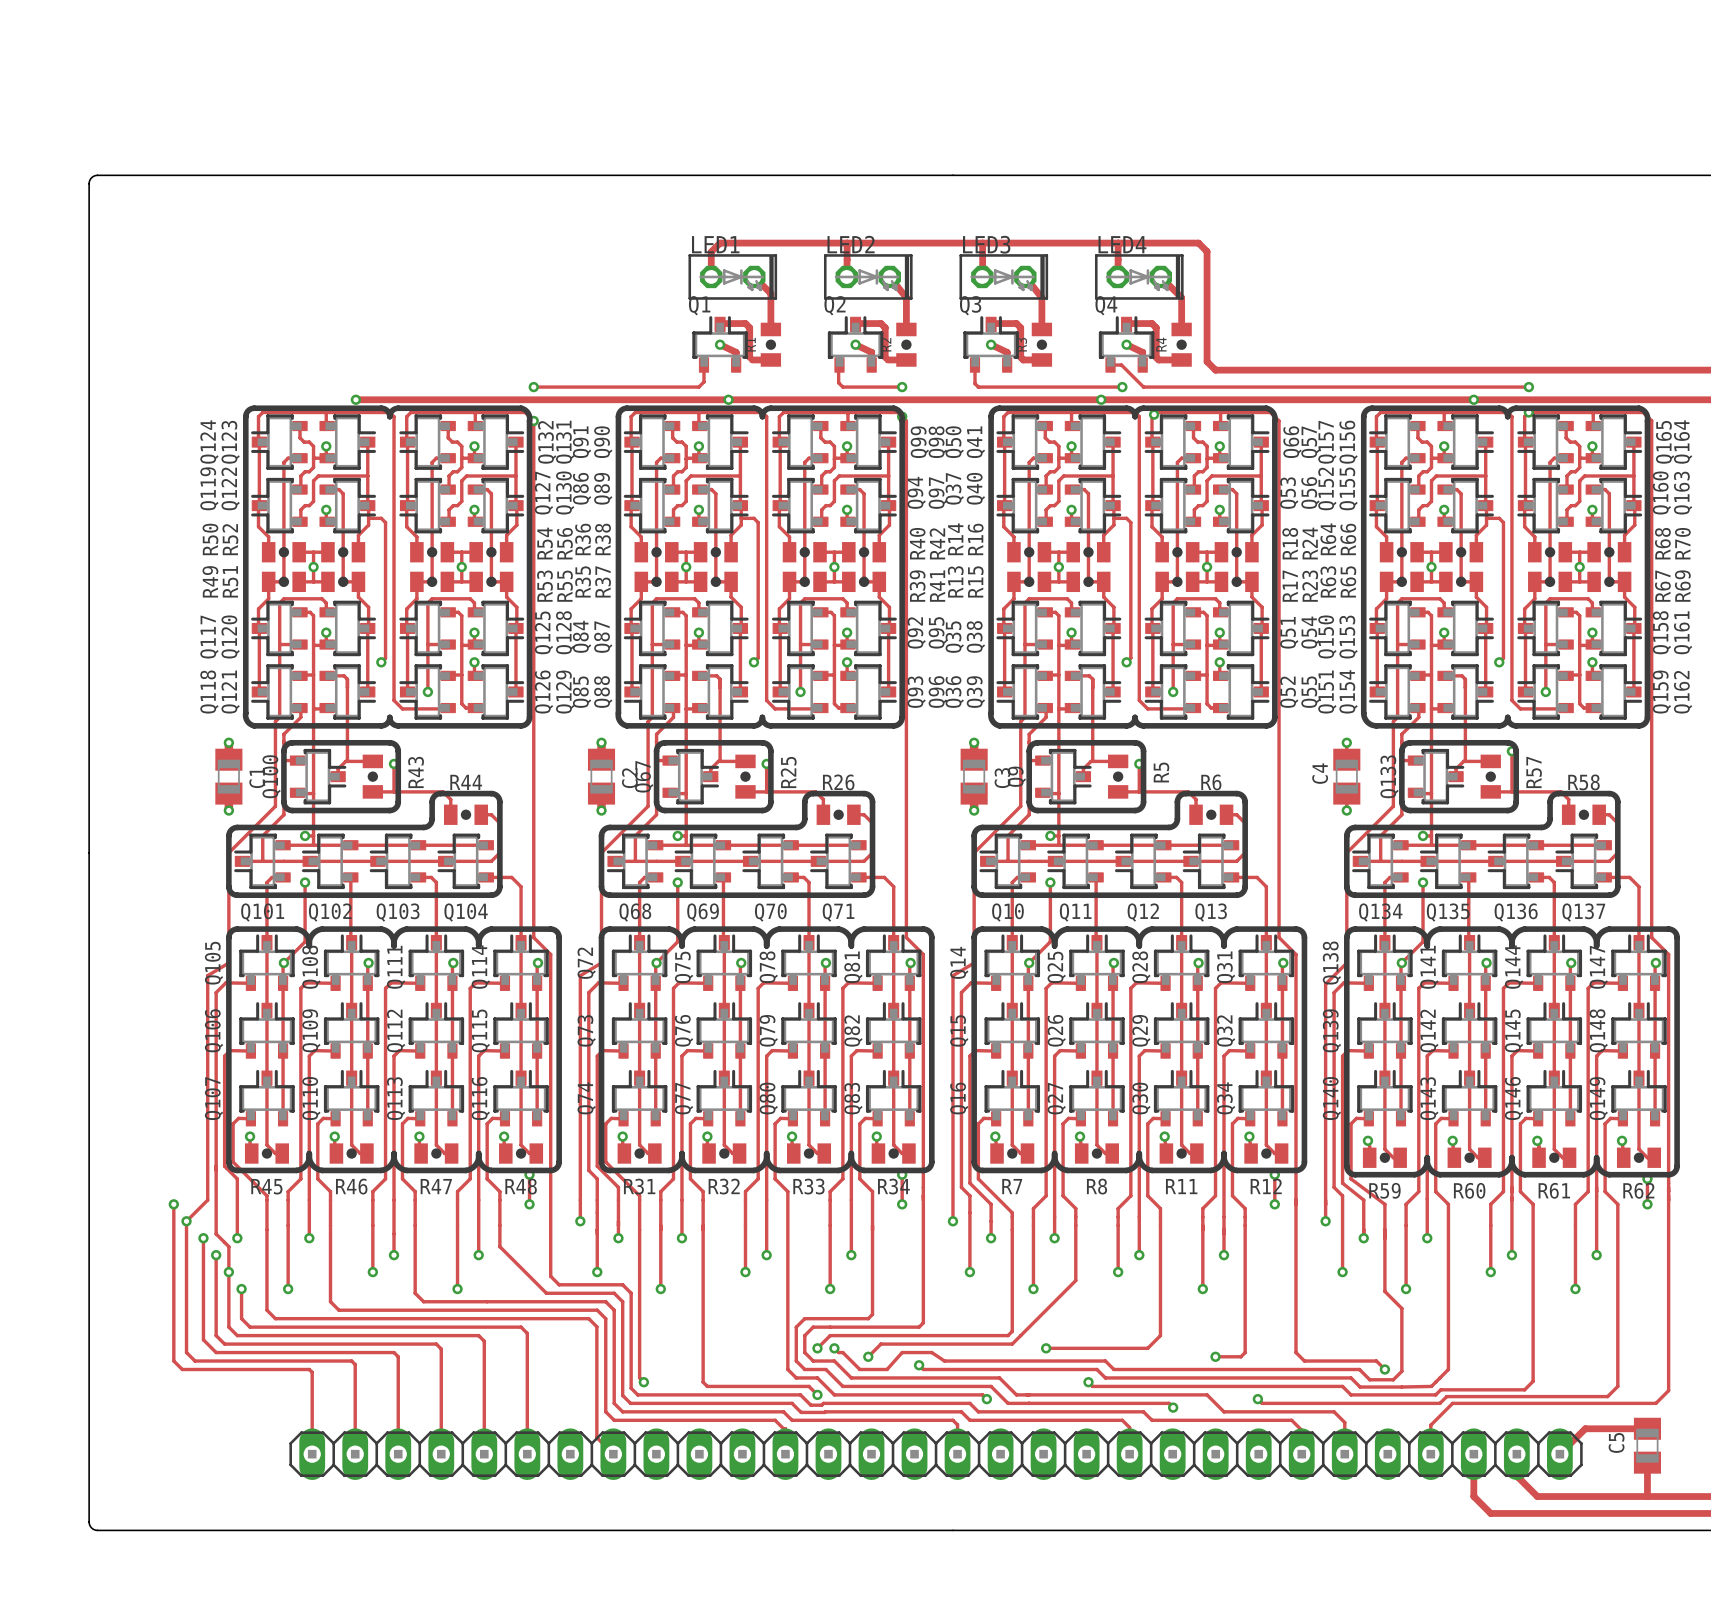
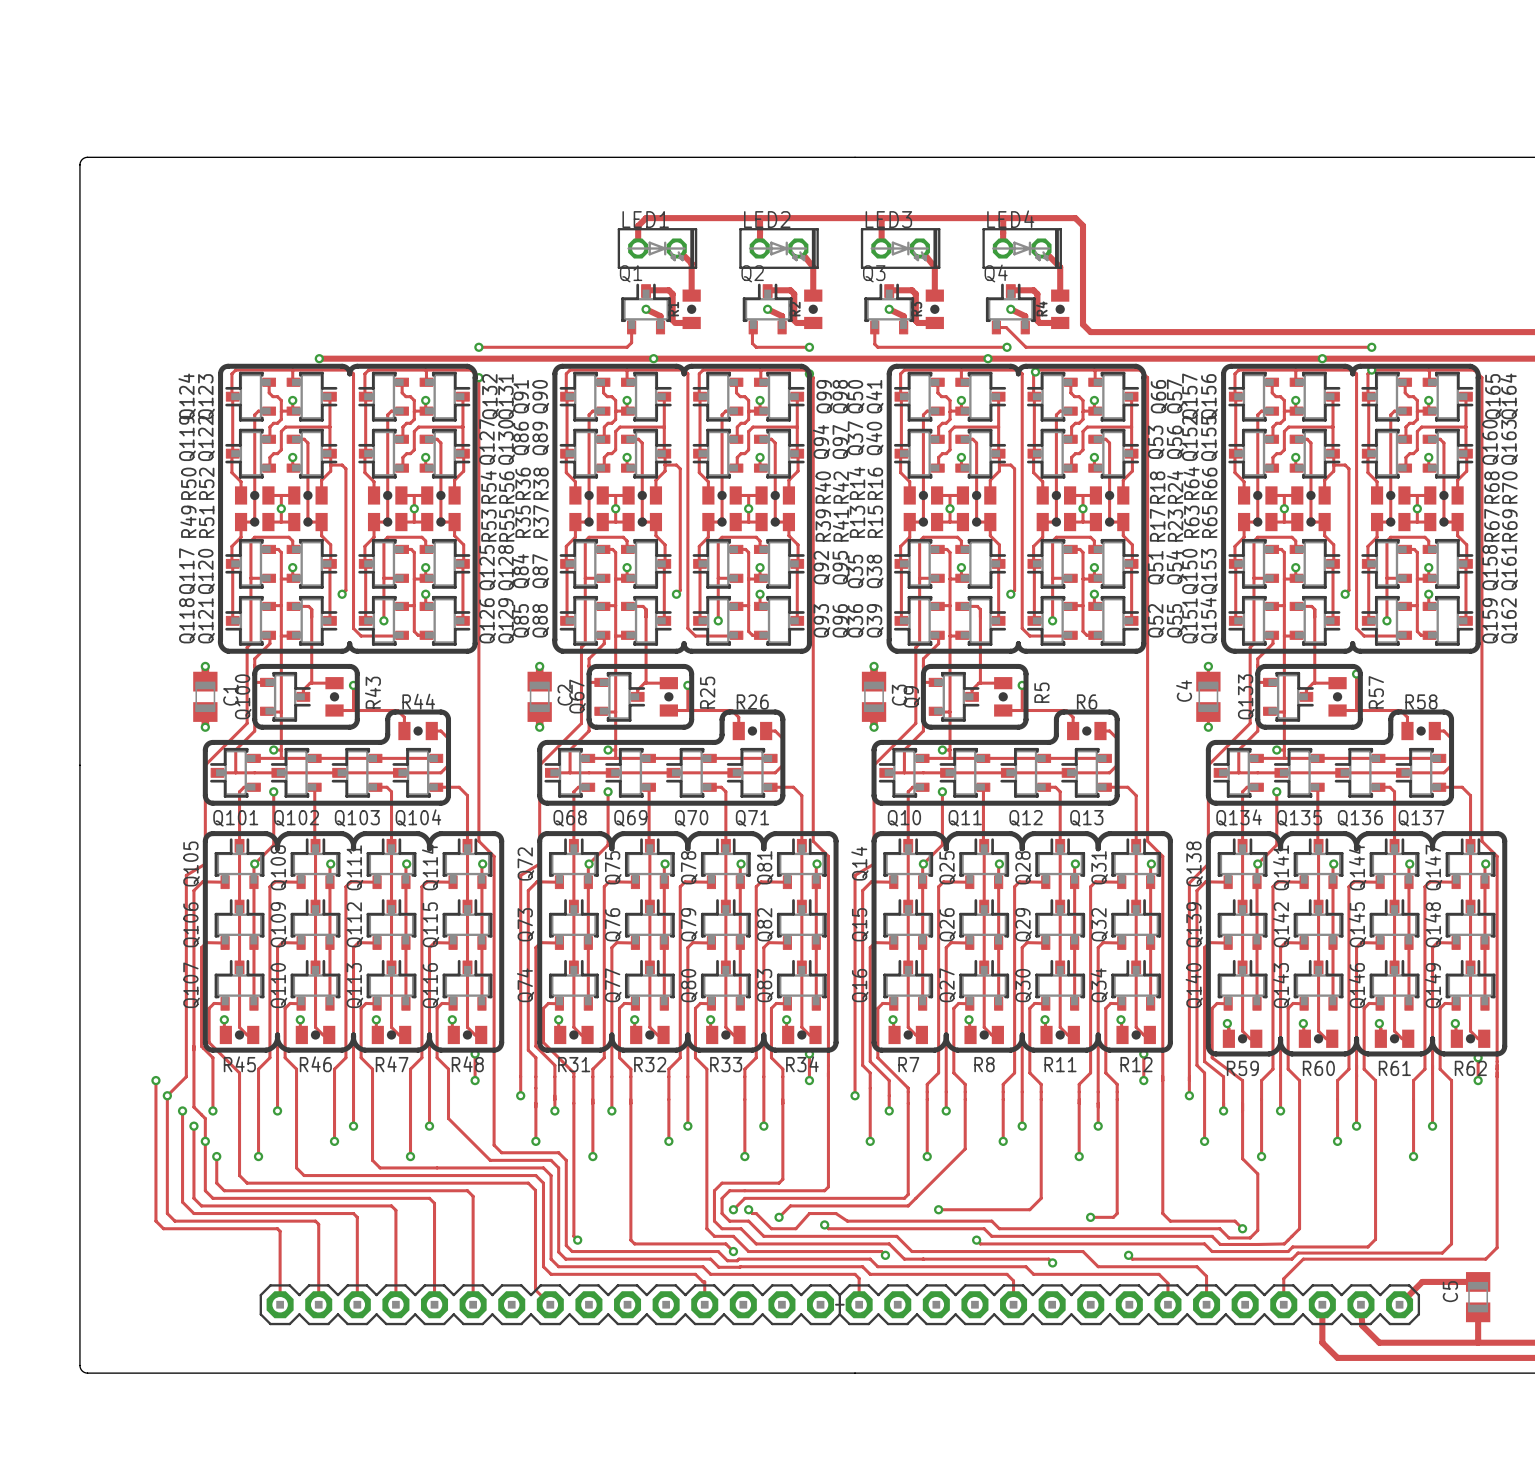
part footprint: [289, 1428, 1583, 1481] -> [259, 1284, 1421, 1326]

